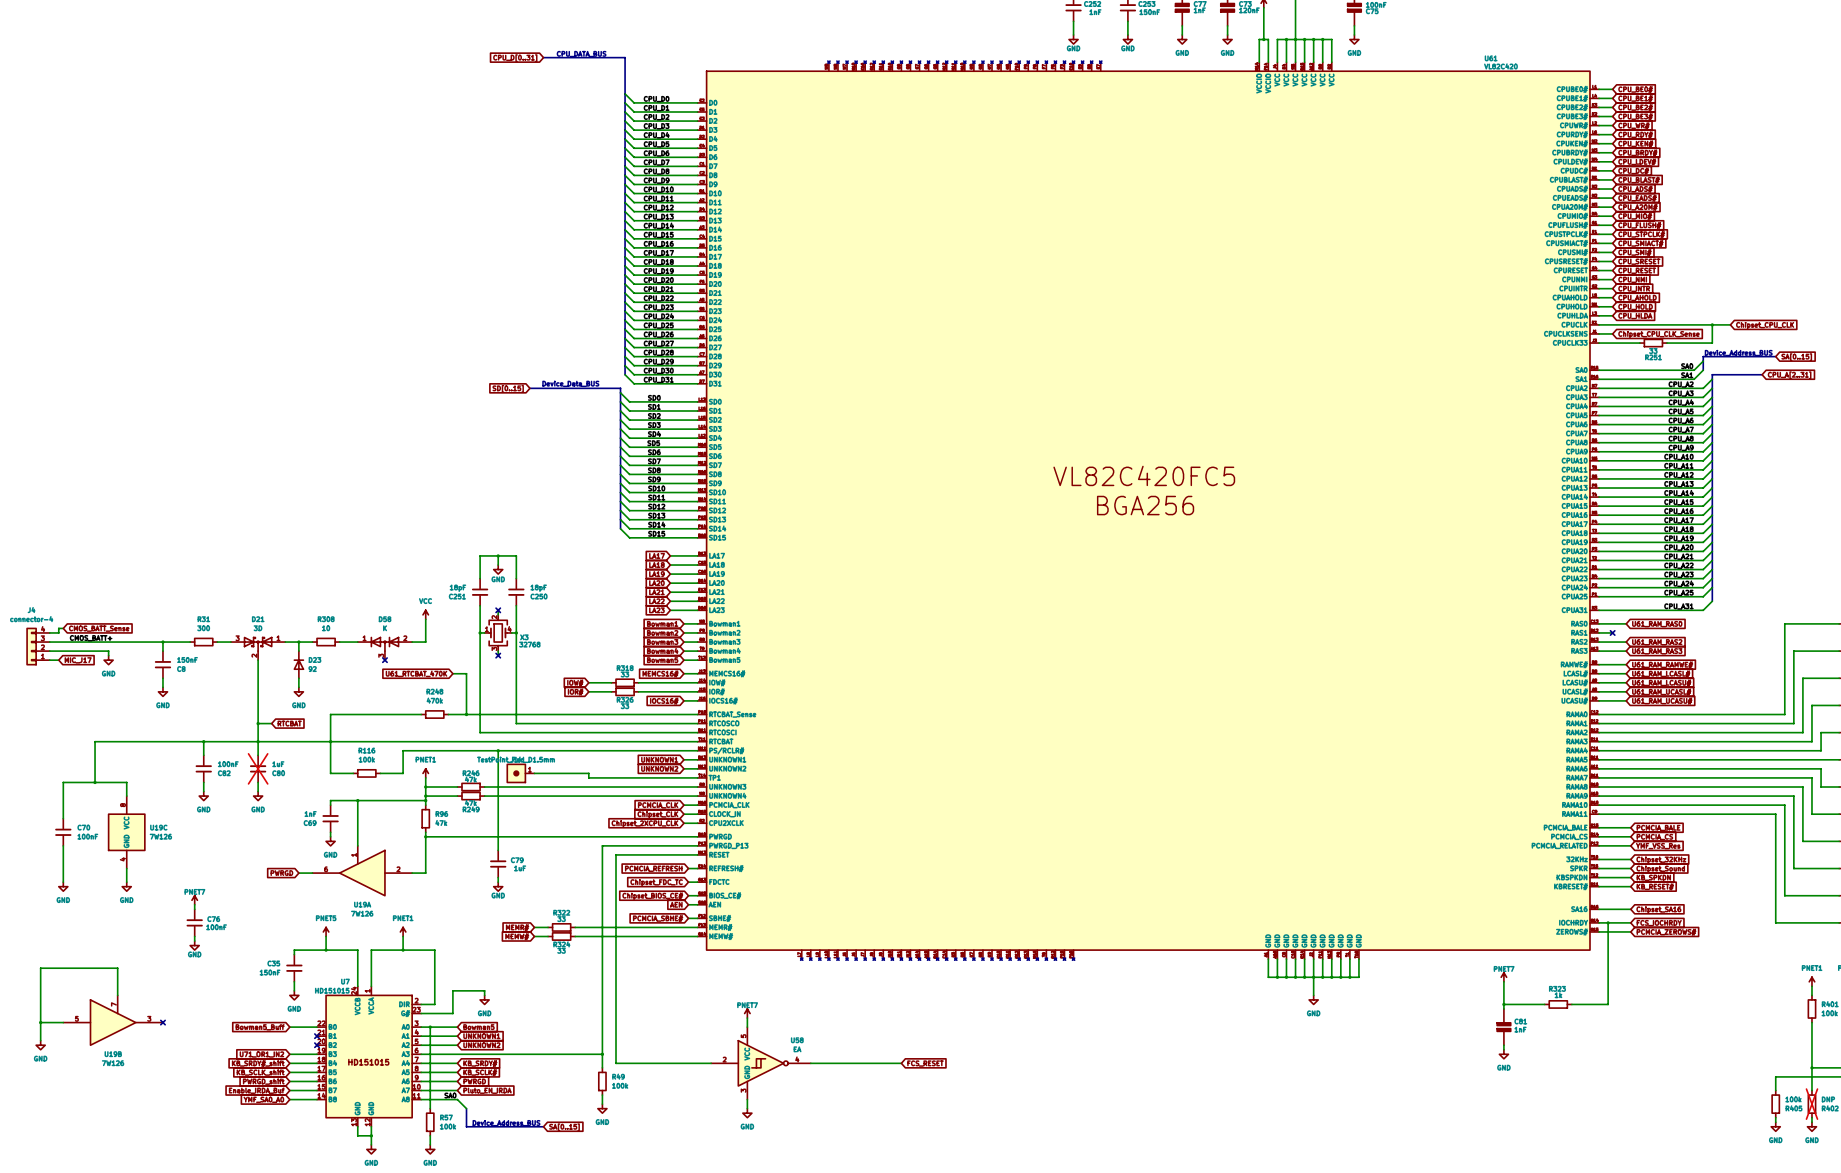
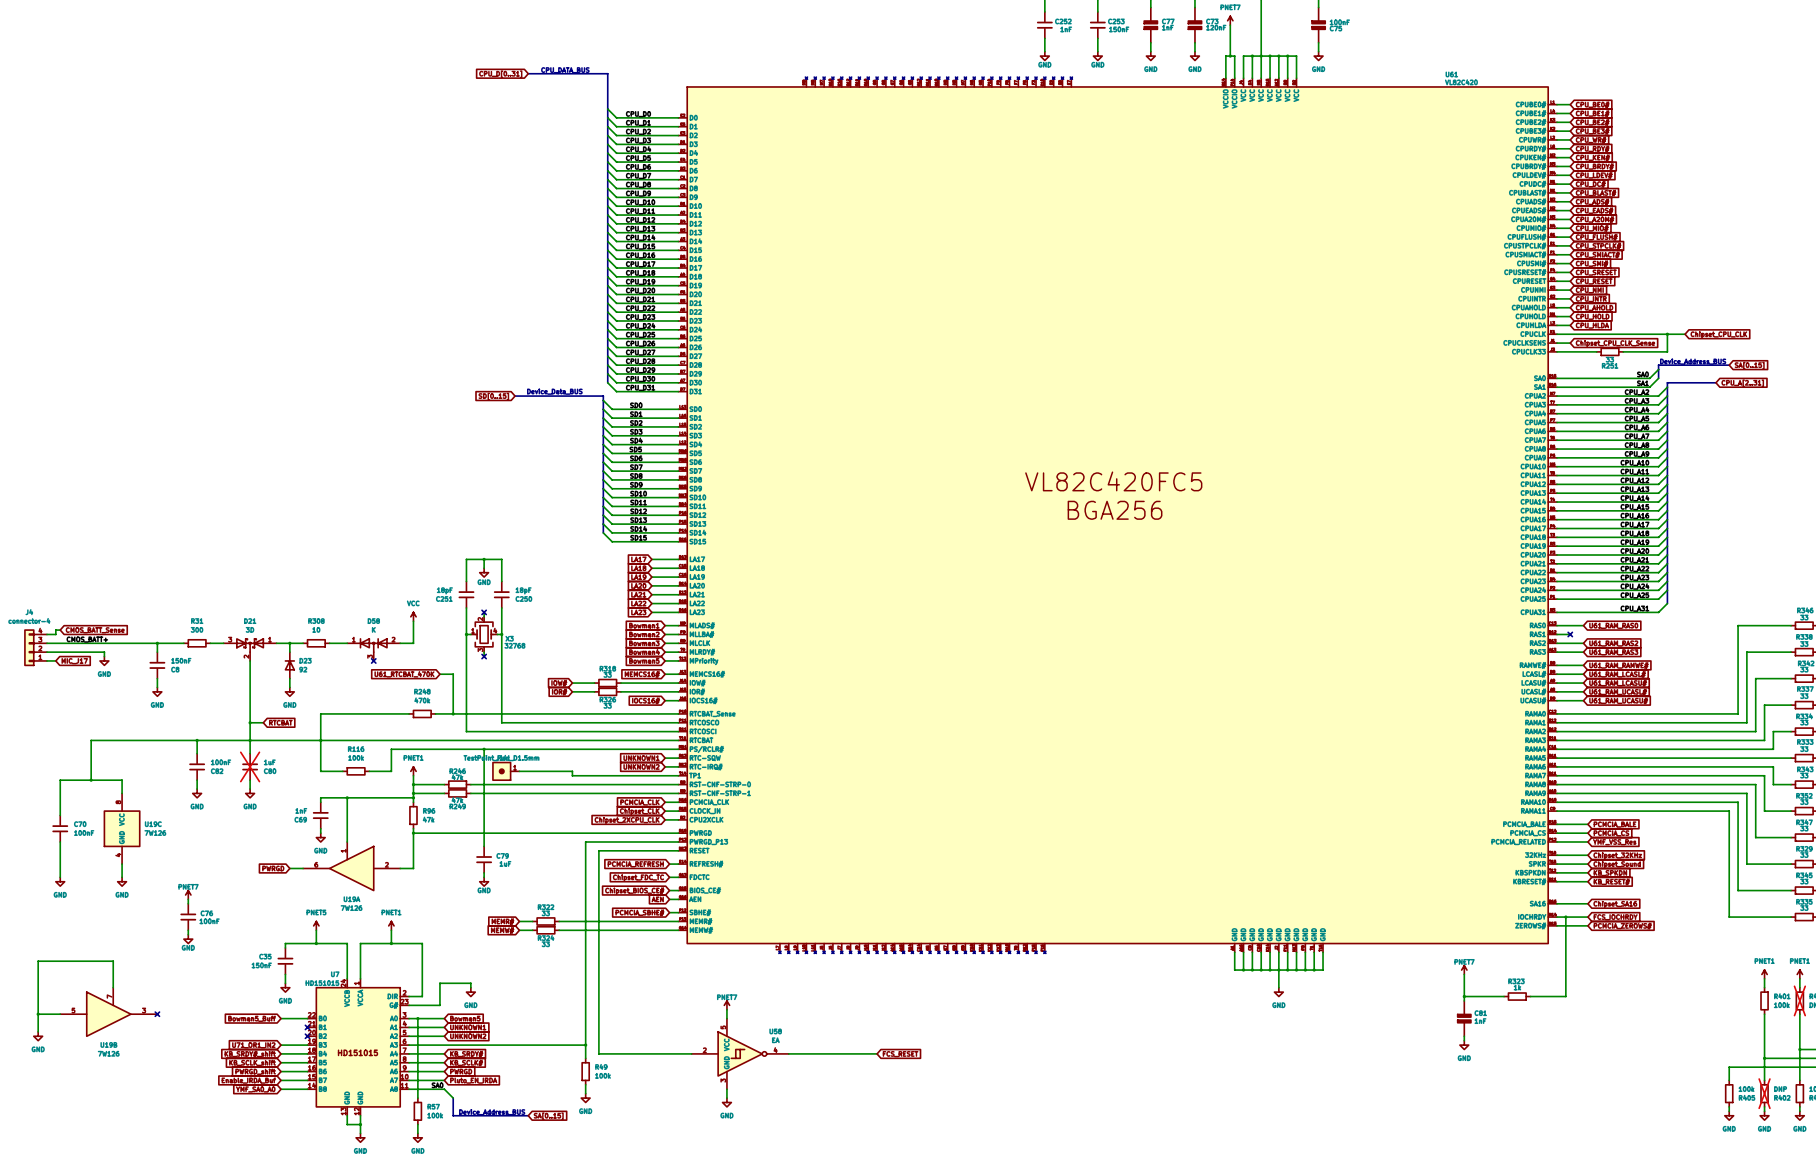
part symbol: [697, 61, 1600, 961] -> [678, 77, 1558, 954]

